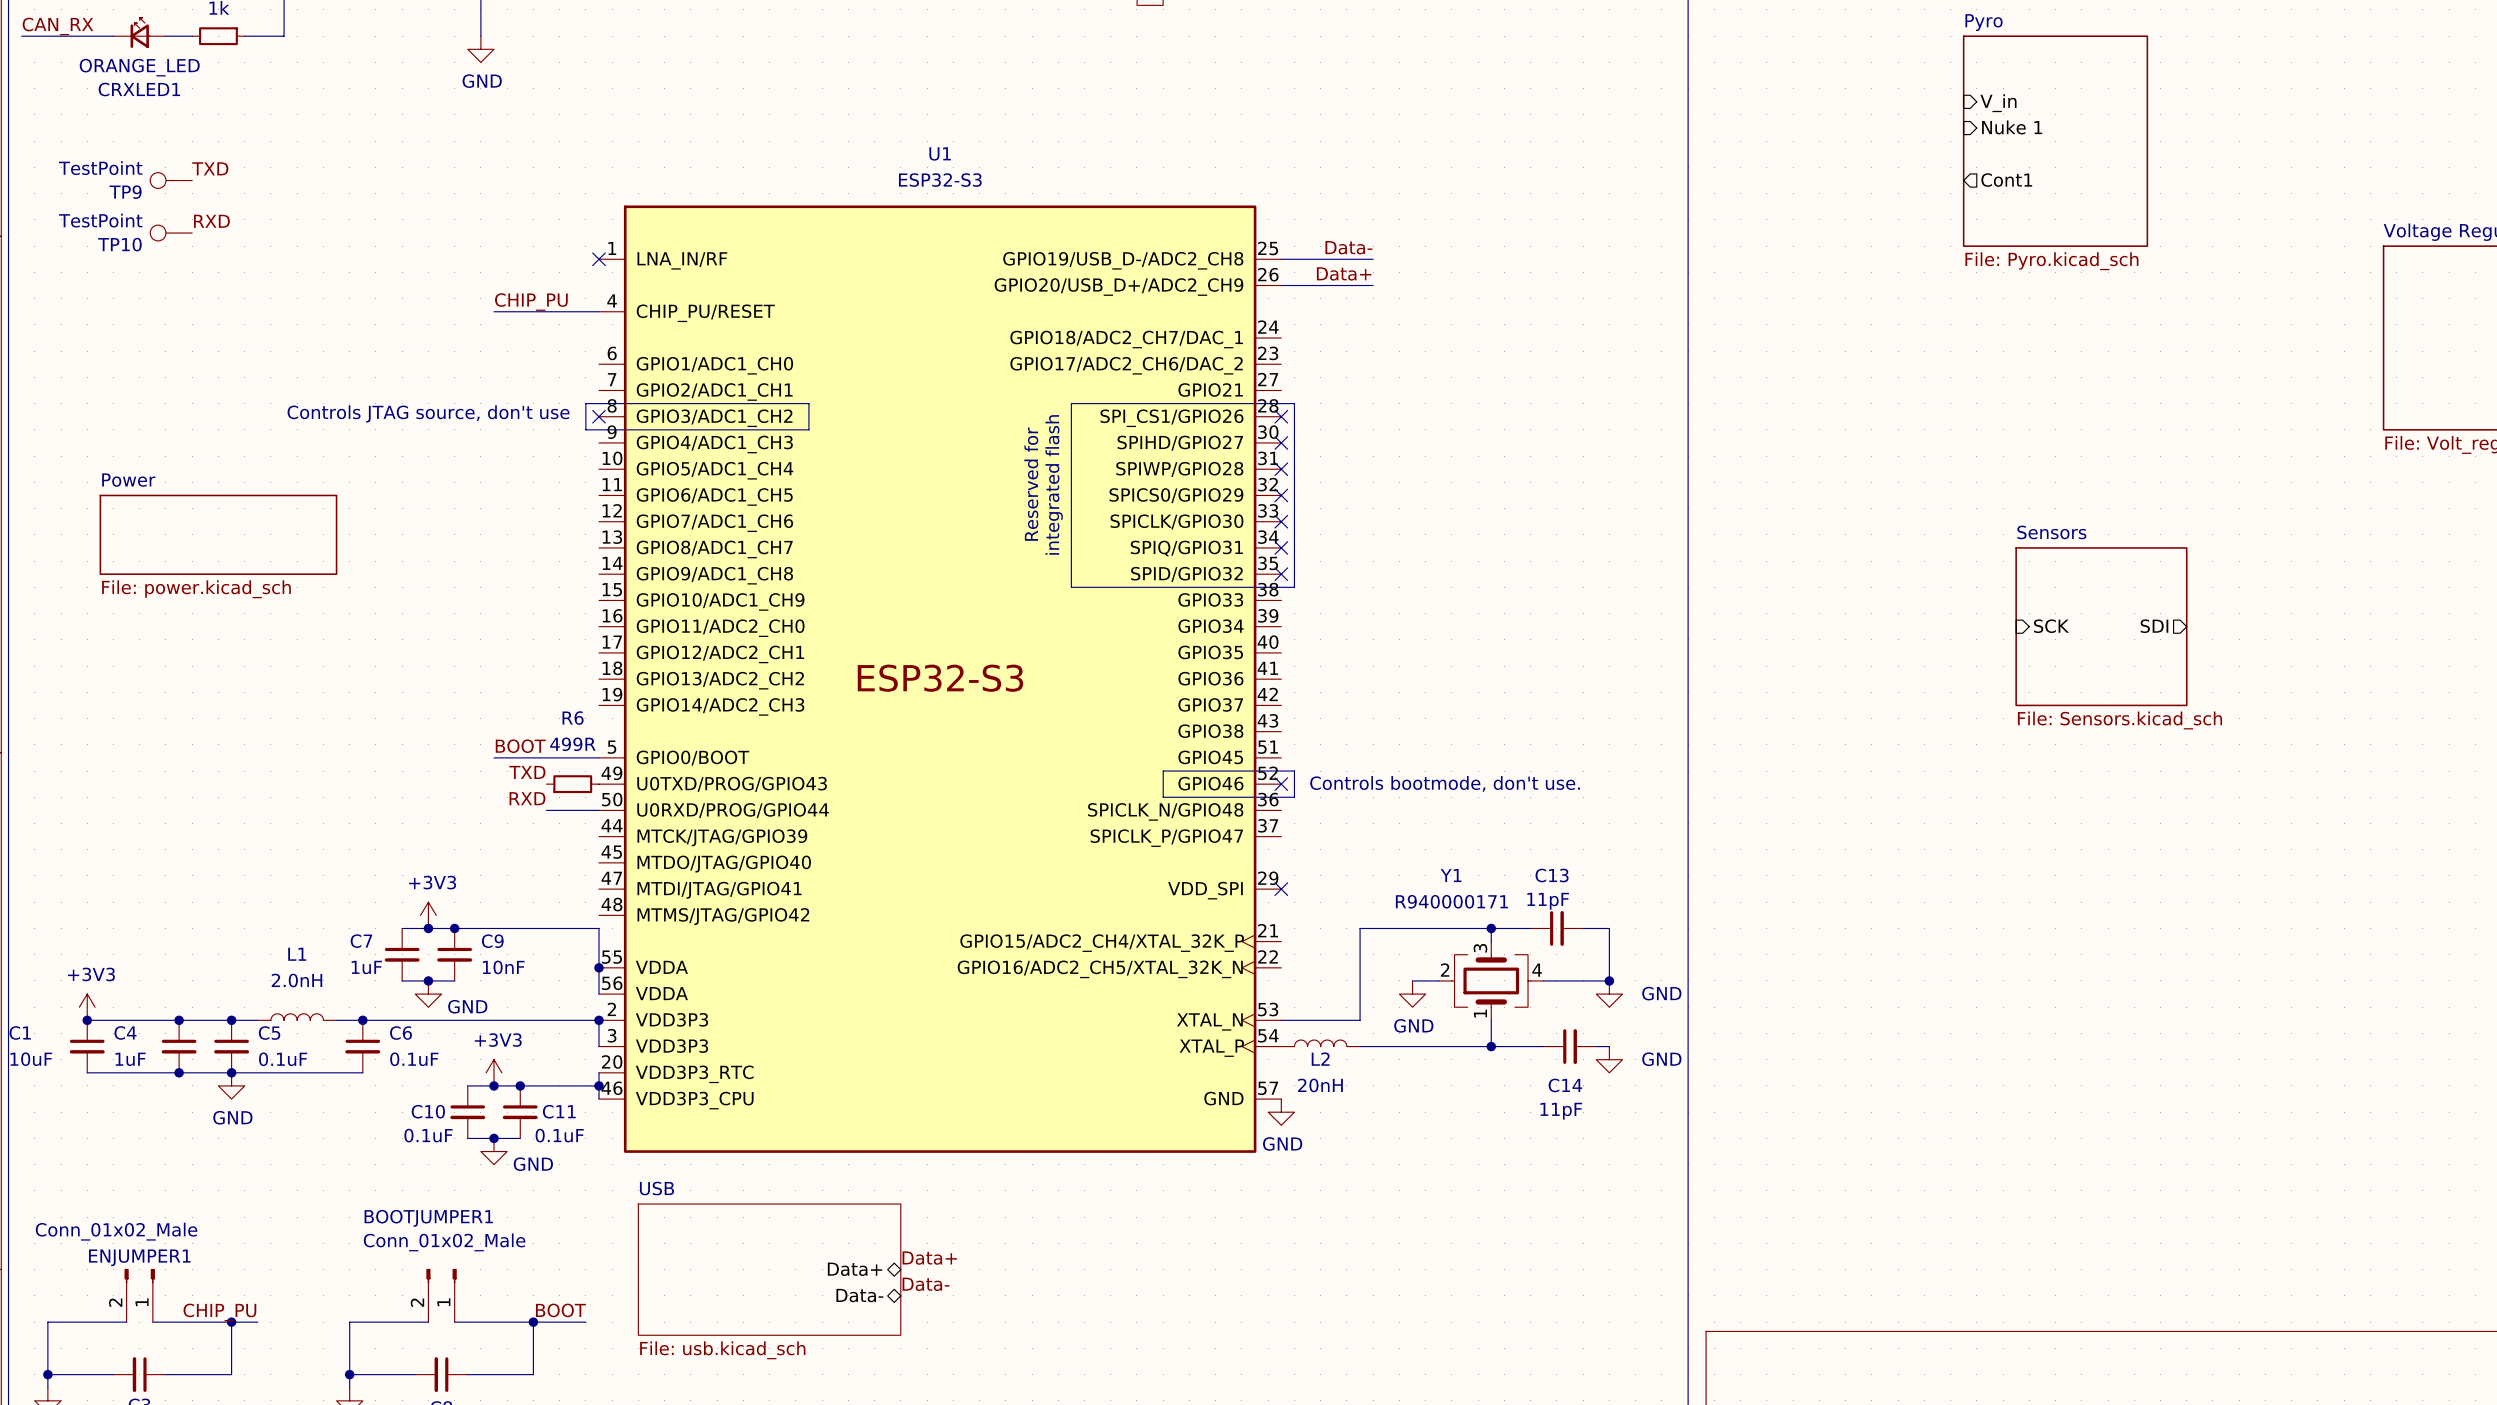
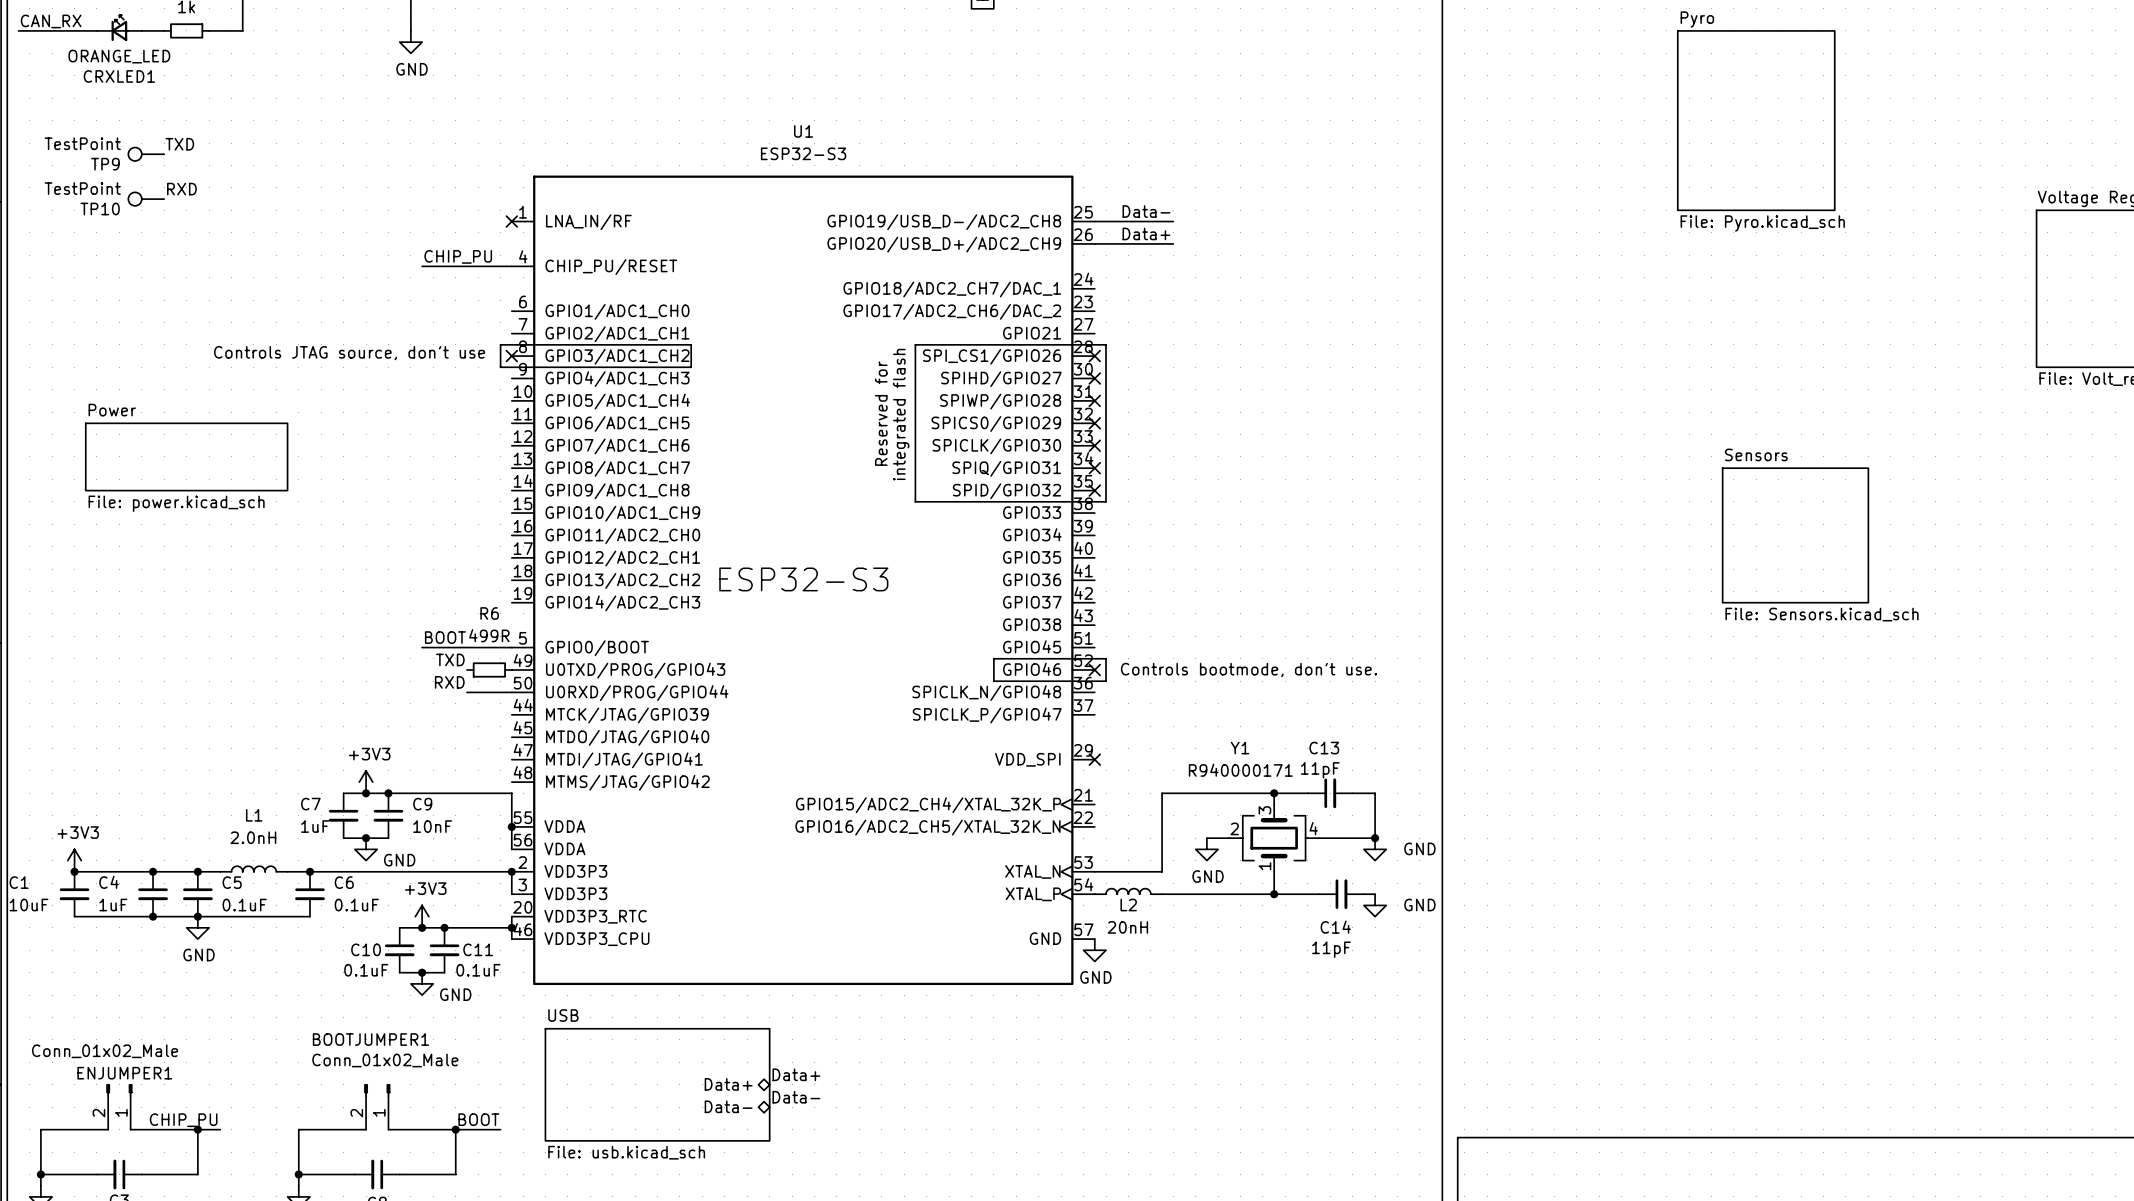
sheet pin: V_in (1998, 103) -> none
sheet pin: Nuke 1 (2012, 127) -> none
sheet pin: Cont1 (2006, 180) -> none
sheet pin: SCK (2051, 626) -> none
sheet pin: SDI (2154, 626) -> none

